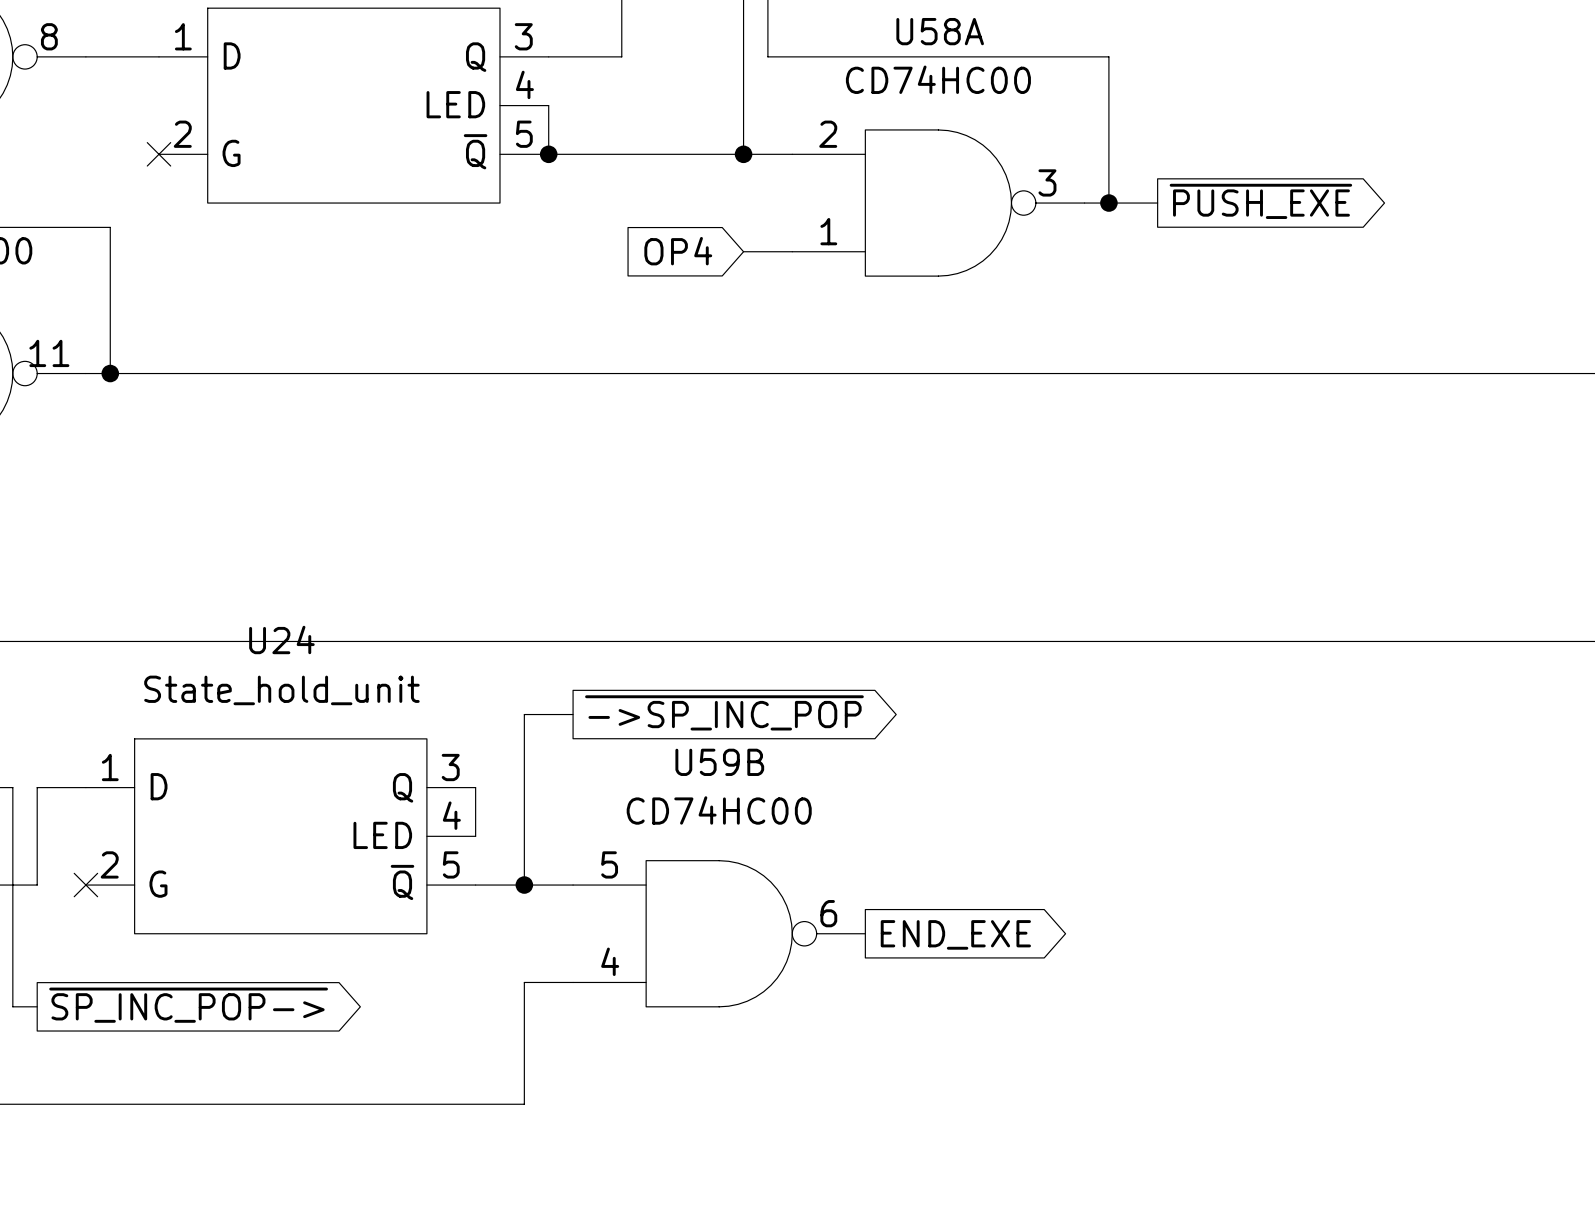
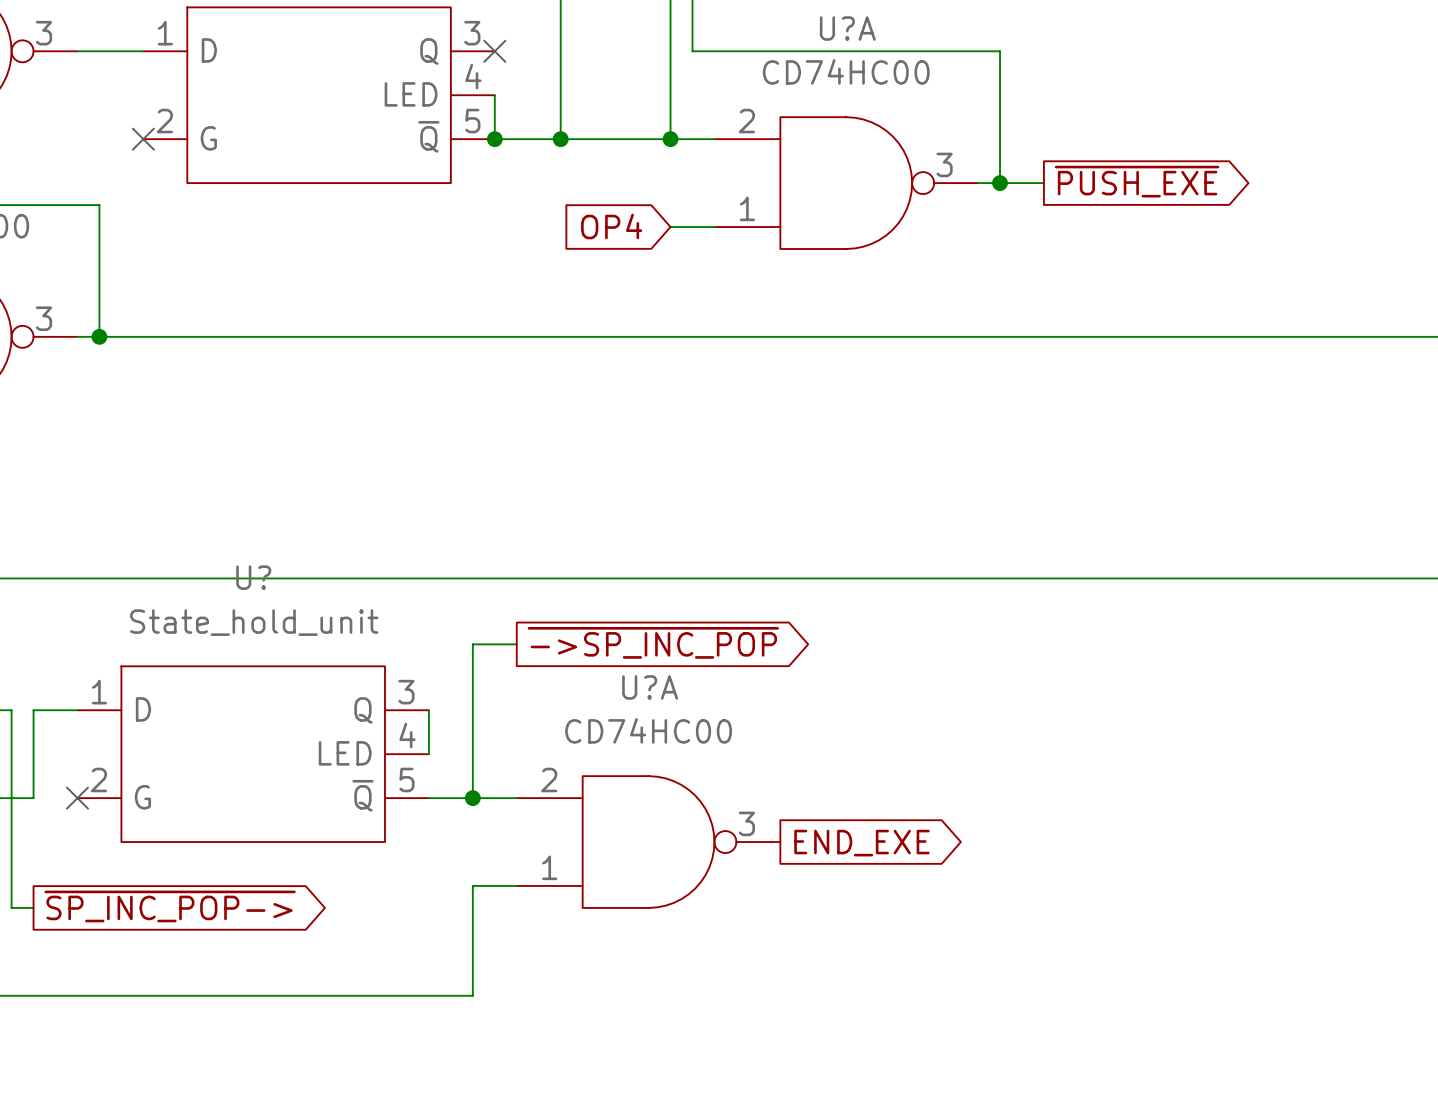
U58A name: U58A (940, 31) -> U?A (847, 28)
part pin number: 8 (49, 36) -> 3 (44, 33)
wire: (548, 56) (621, 56) -> (560, 139) (560, 51)
no-connect mark: none -> (494, 51)
junction: none -> (560, 139)
part pin number: 11 (49, 353) -> 3 (44, 318)
U24 name: U24 (281, 639) -> U? (253, 577)
U59B name: U59B (719, 762) -> U?A (650, 687)
U59B pin number: 5 (609, 864) -> 2 (549, 779)
U59B pin number: 6 (828, 913) -> 3 (746, 823)
U59B pin number: 4 (610, 961) -> 1 (549, 867)

